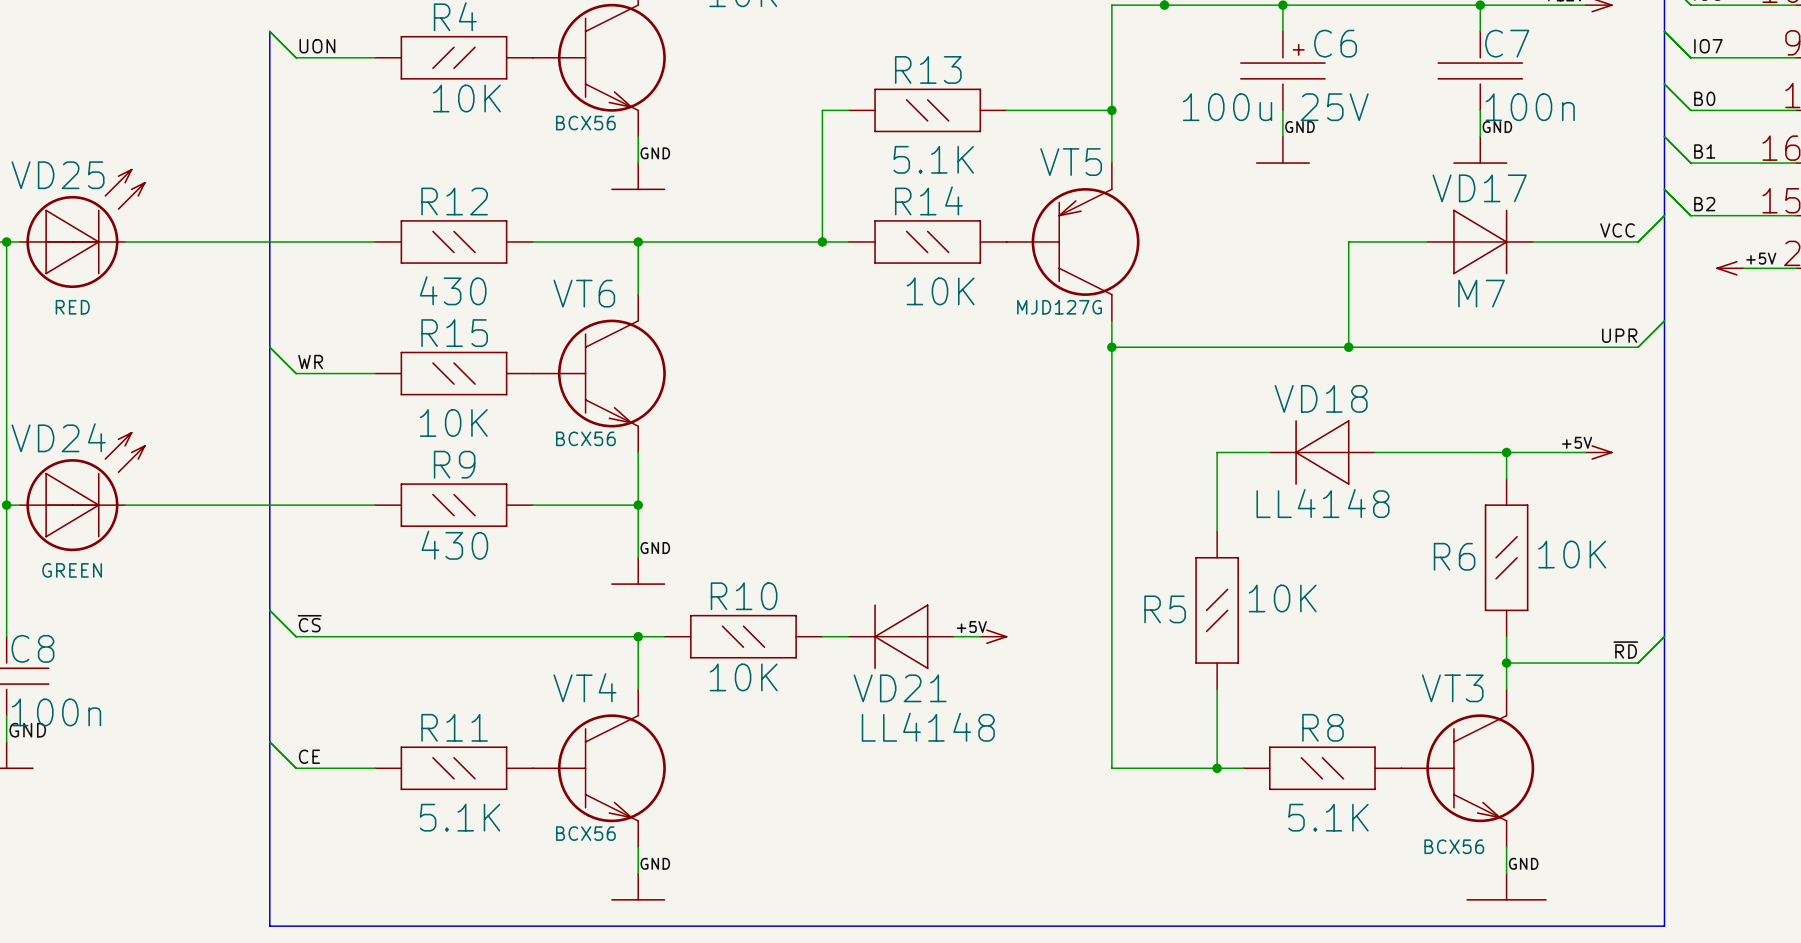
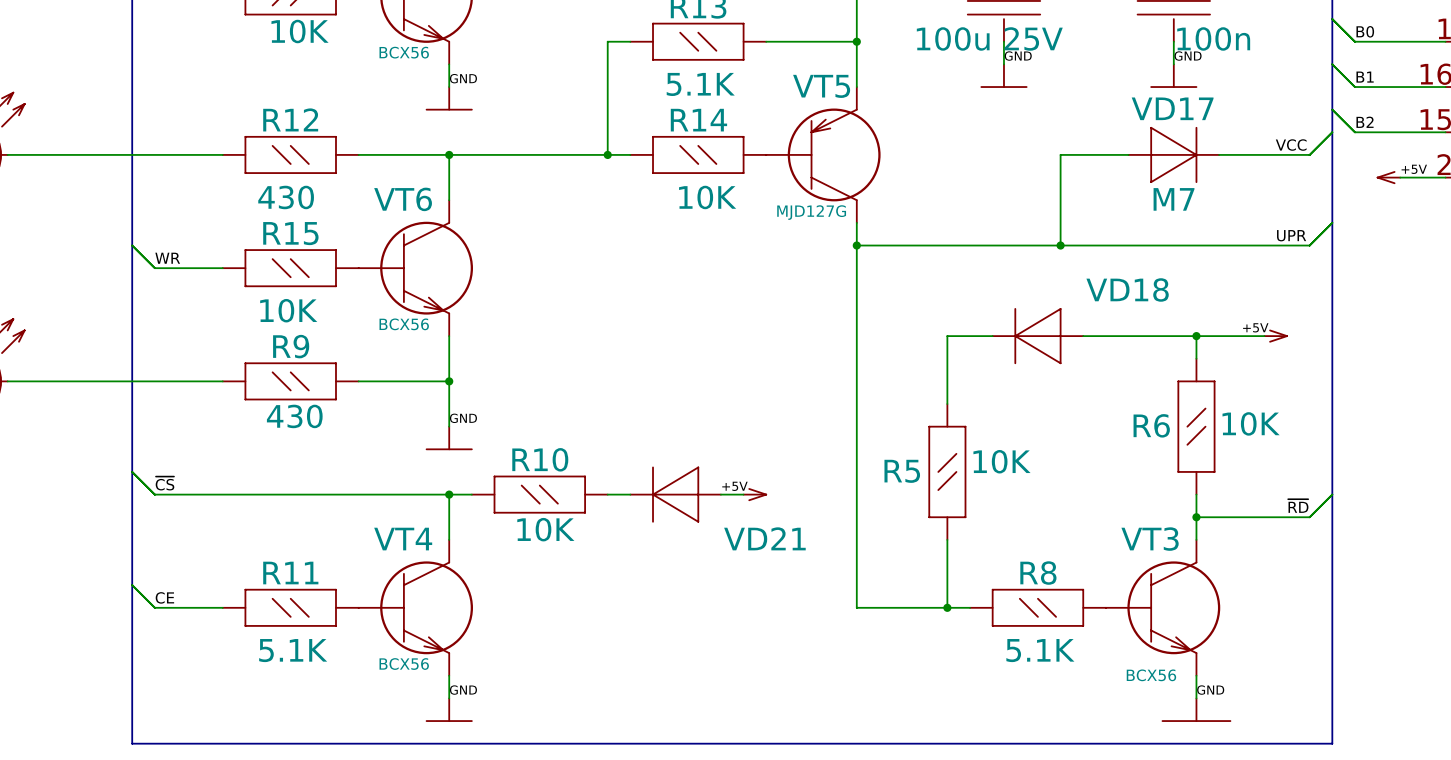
VD18 name position: VD18 (1321, 398) -> VD18 (1127, 289)
VD18 value: LL4148 (1323, 503) -> none
VD21 name position: VD21 (900, 688) -> VD21 (764, 538)
VD21 value: LL4148 (928, 727) -> none

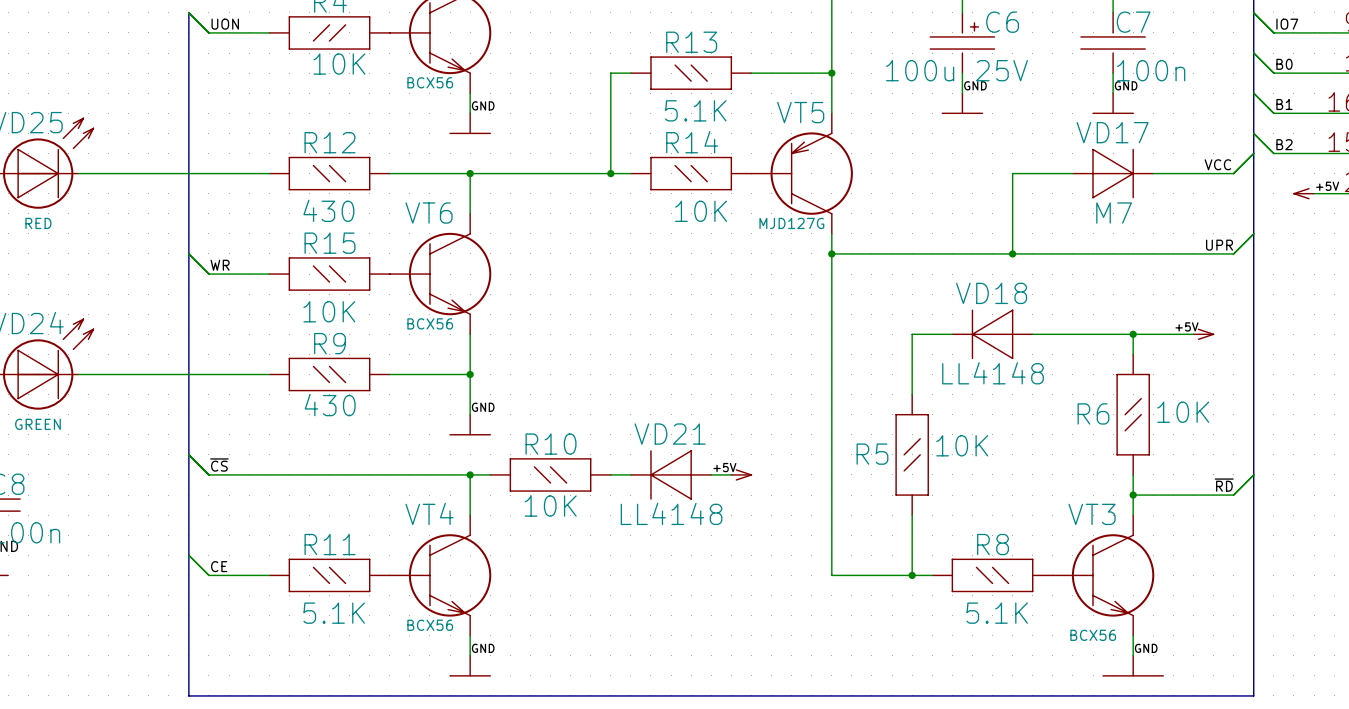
VD18 name position: VD18 (1127, 289) -> VD18 (991, 293)
VD18 value: none -> LL4148 (993, 373)
VD21 name position: VD21 (764, 538) -> VD21 (670, 434)
VD21 value: none -> LL4148 (671, 513)

